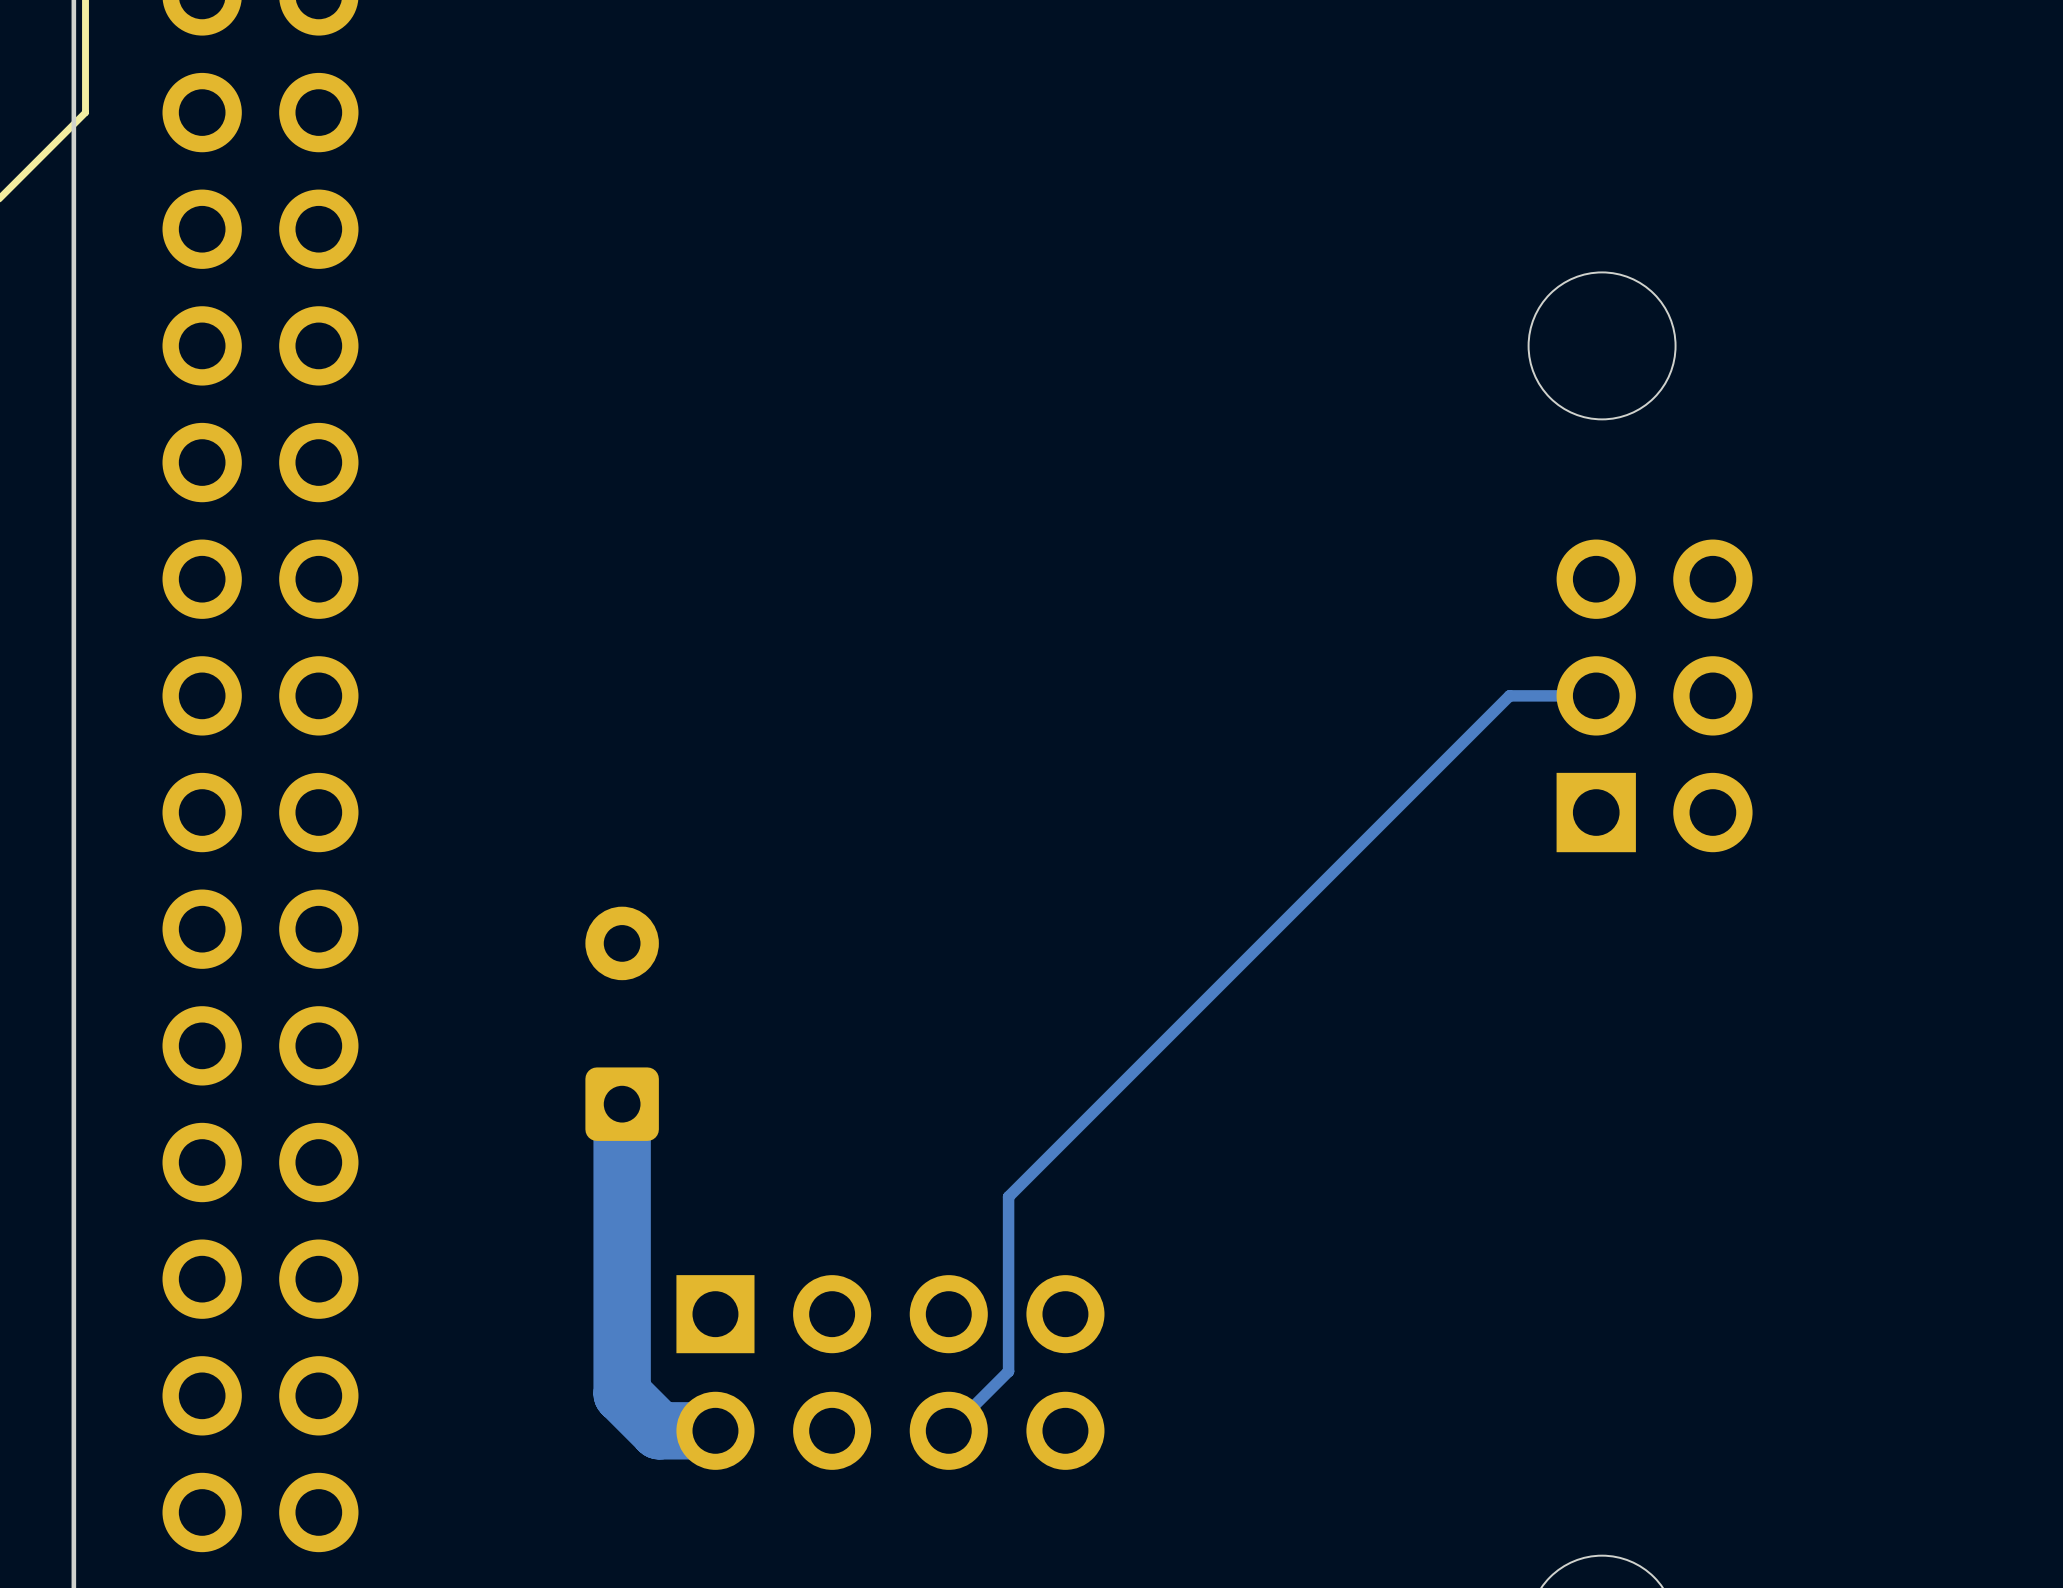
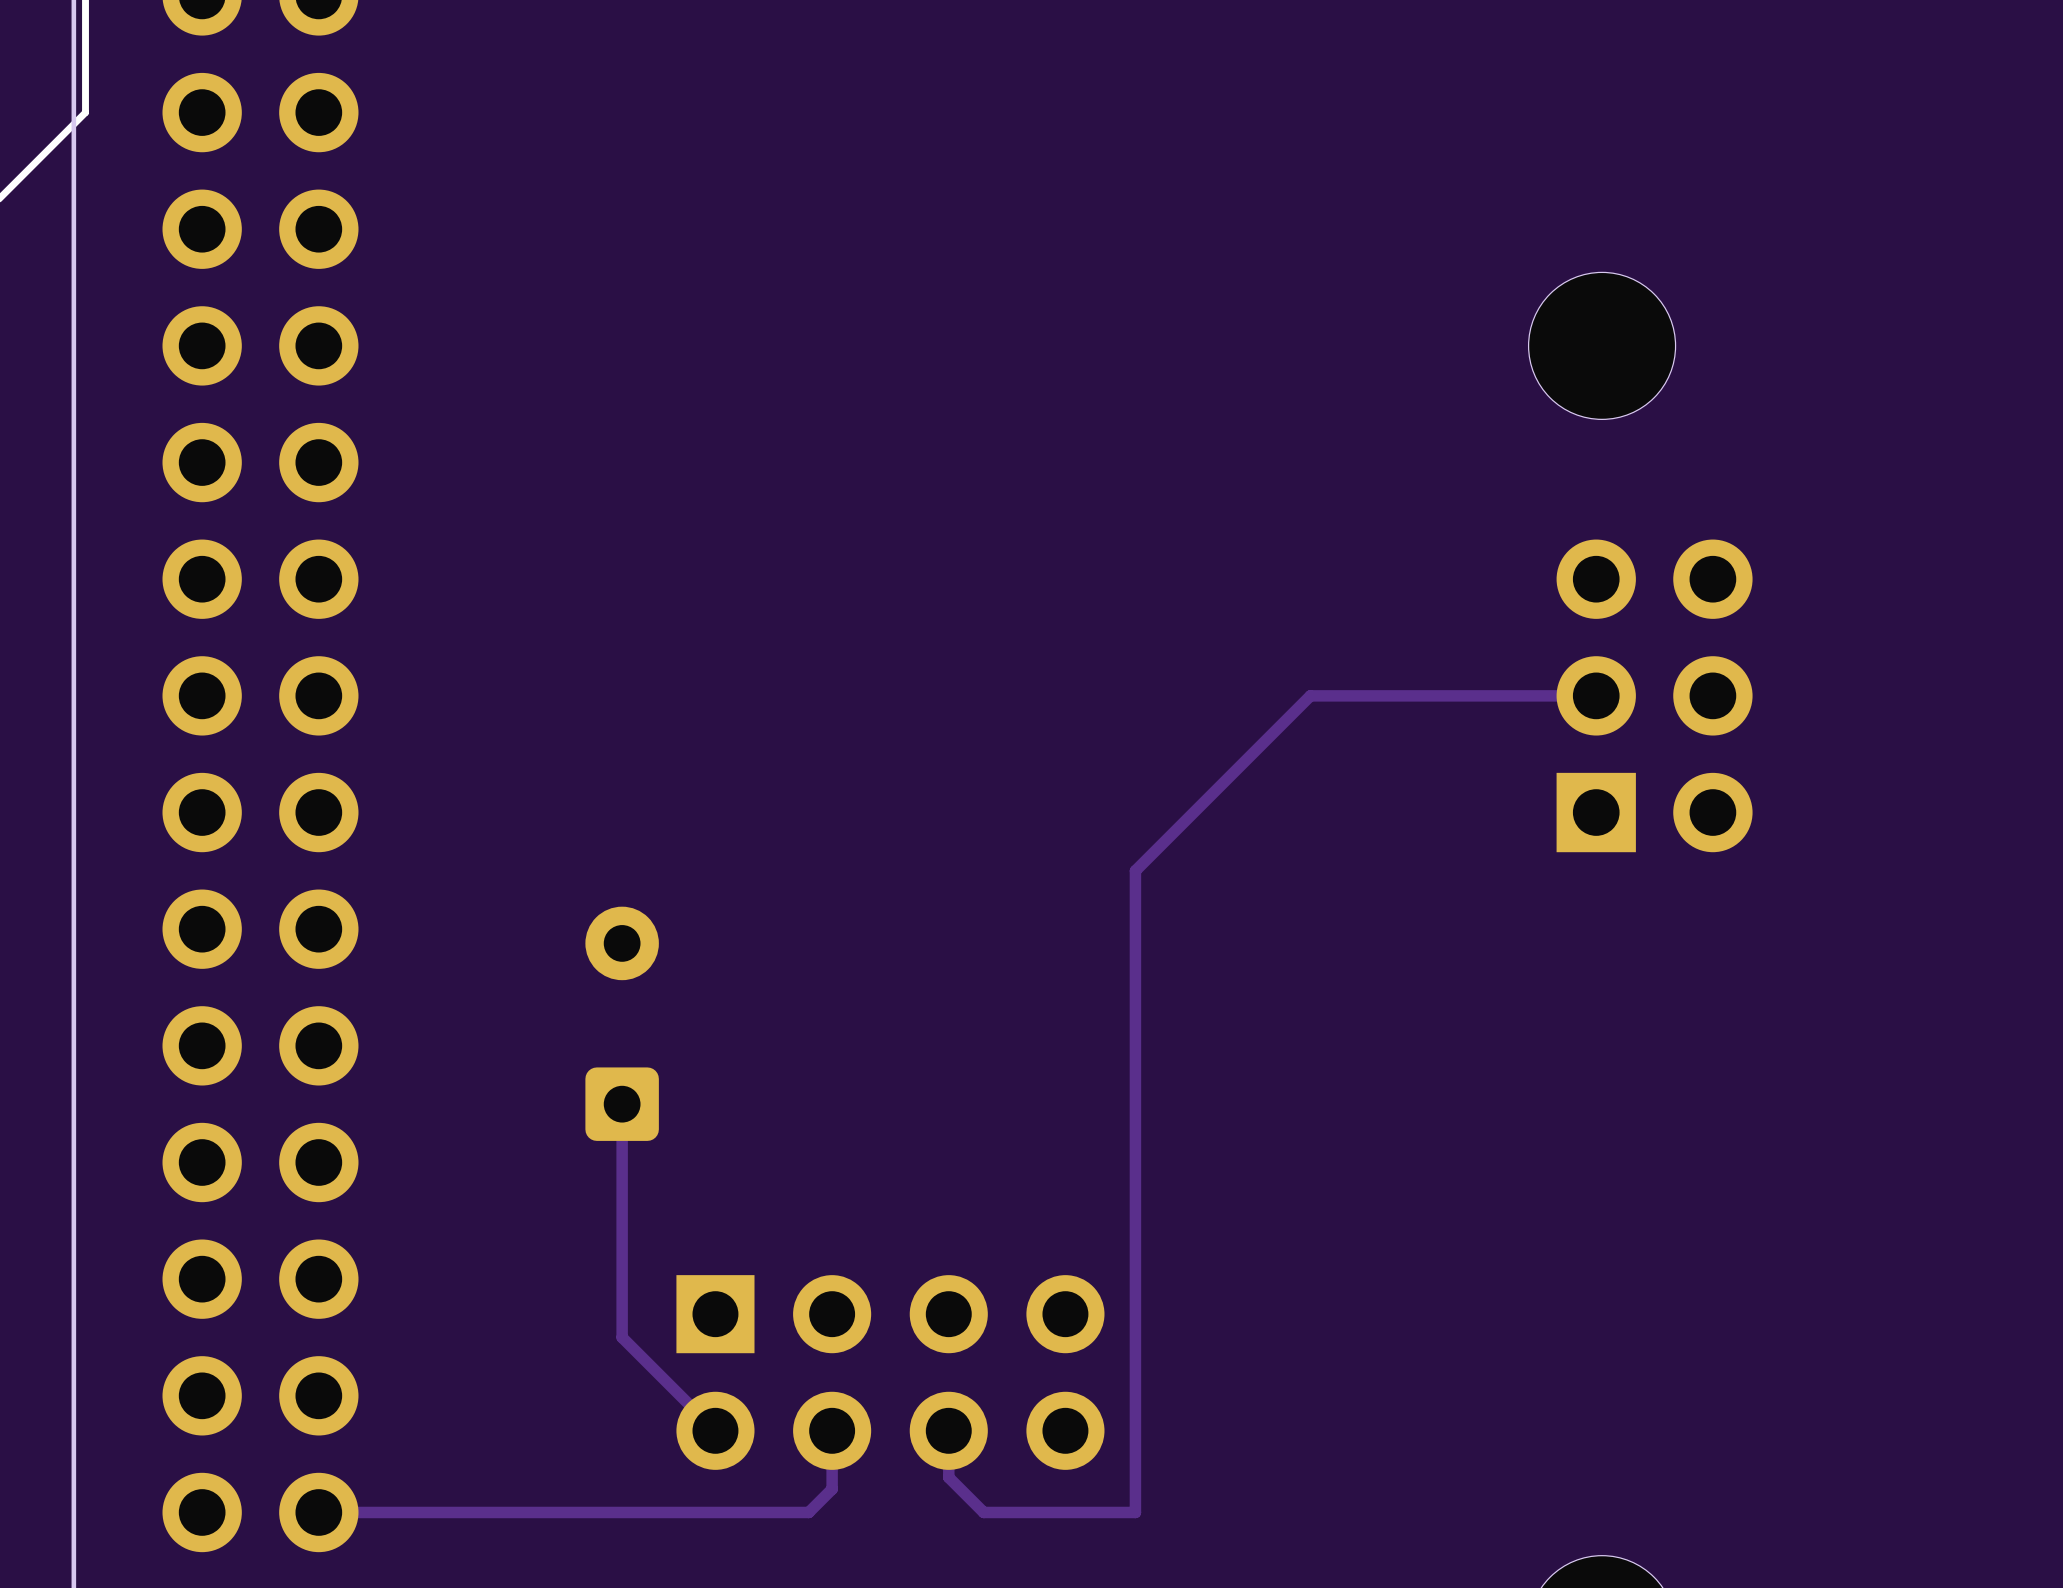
track: (1509, 695) (1008, 1196) (1008, 1371) (948, 1431) -> (1509, 695) (1310, 695) (1135, 870) (1135, 1512) (983, 1512) (948, 1477) (948, 1430)
track width: thick (622, 1104) (622, 1337) -> thin (622, 1104) (622, 1337)
track: (622, 1337) (622, 1393) (659, 1430) (715, 1430) -> (622, 1337) (715, 1430)
track: none -> (832, 1430) (832, 1489) (808, 1512) (318, 1512)

